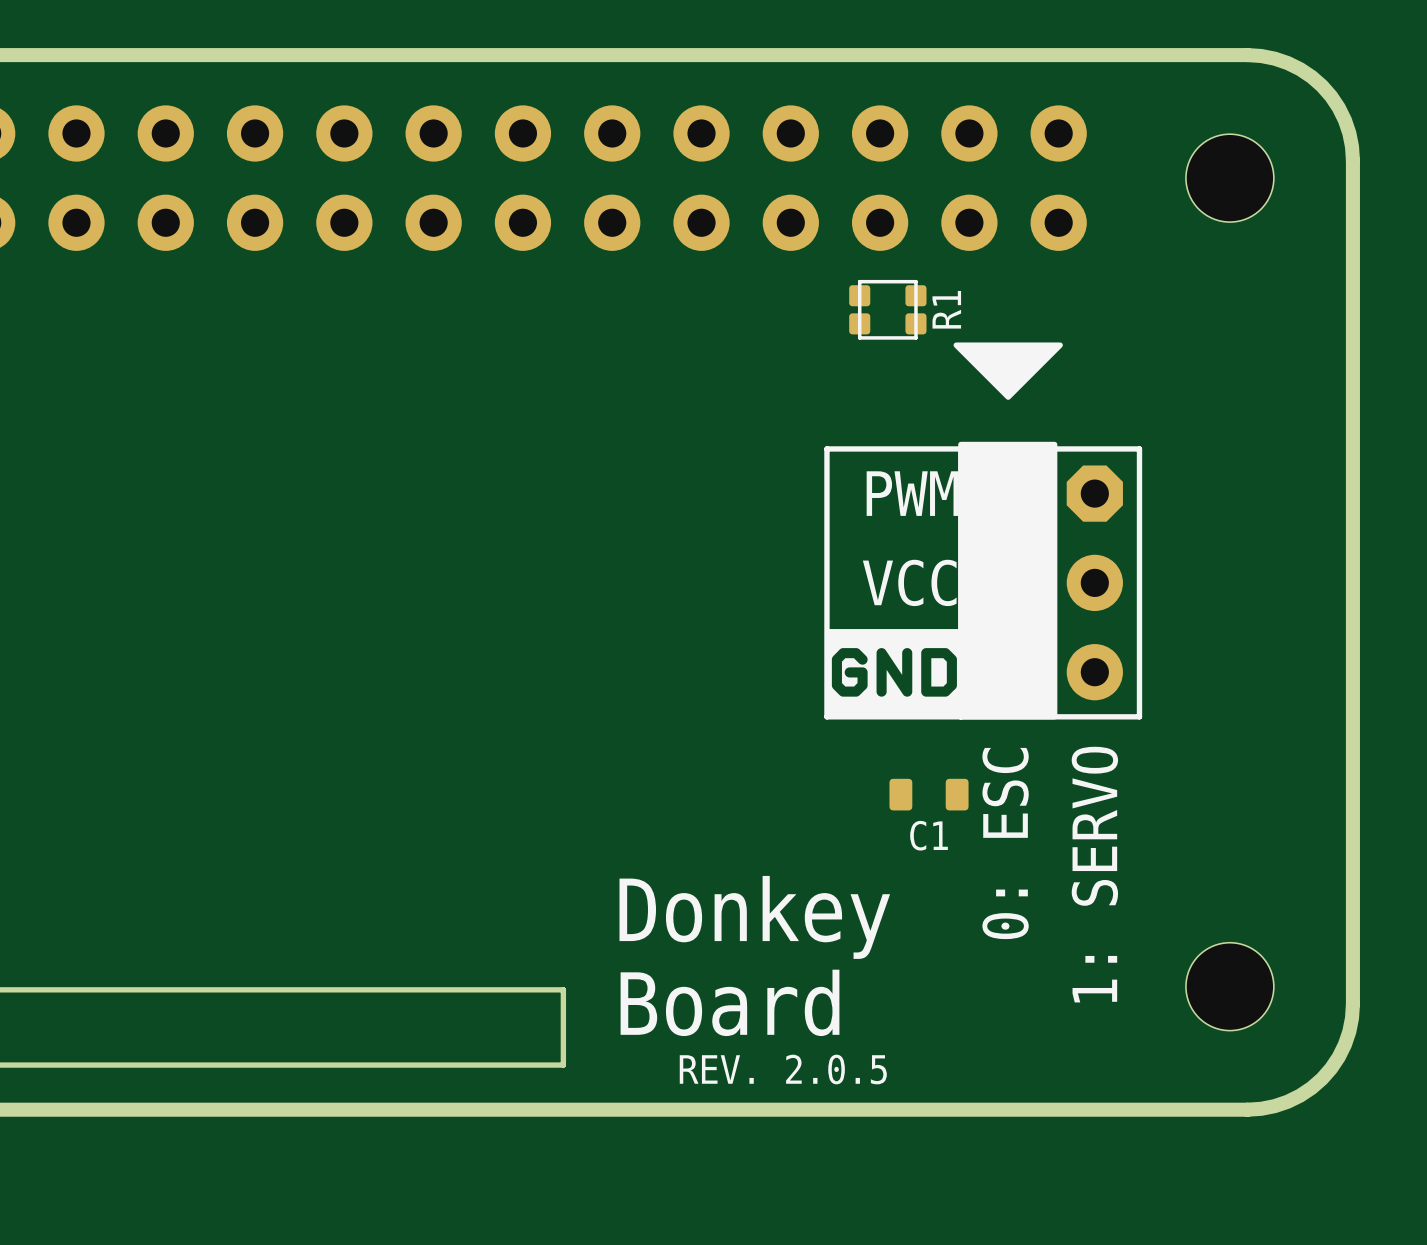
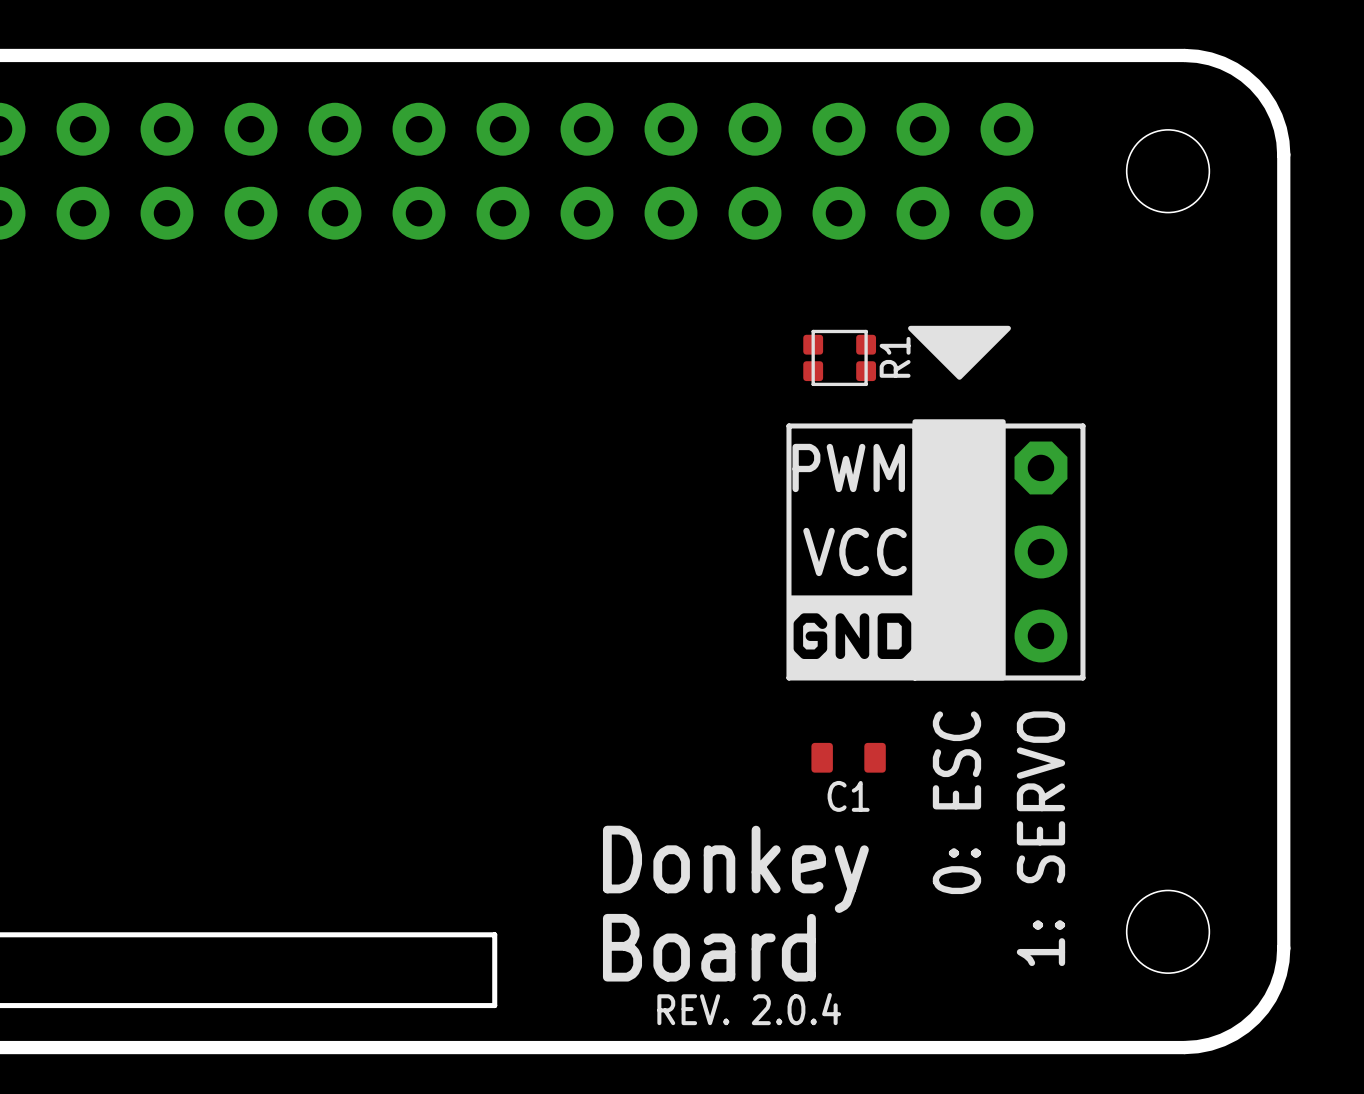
R1 position: (887, 309) -> (839, 357)
C1 position: (929, 794) -> (848, 757)
board edge: (514, 989) (563, 989) (563, 1065) (514, 1065) -> (494, 934) (494, 1005)
text: REV. 2.0.5 (783, 1069) -> REV. 2.0.4 (749, 1009)

